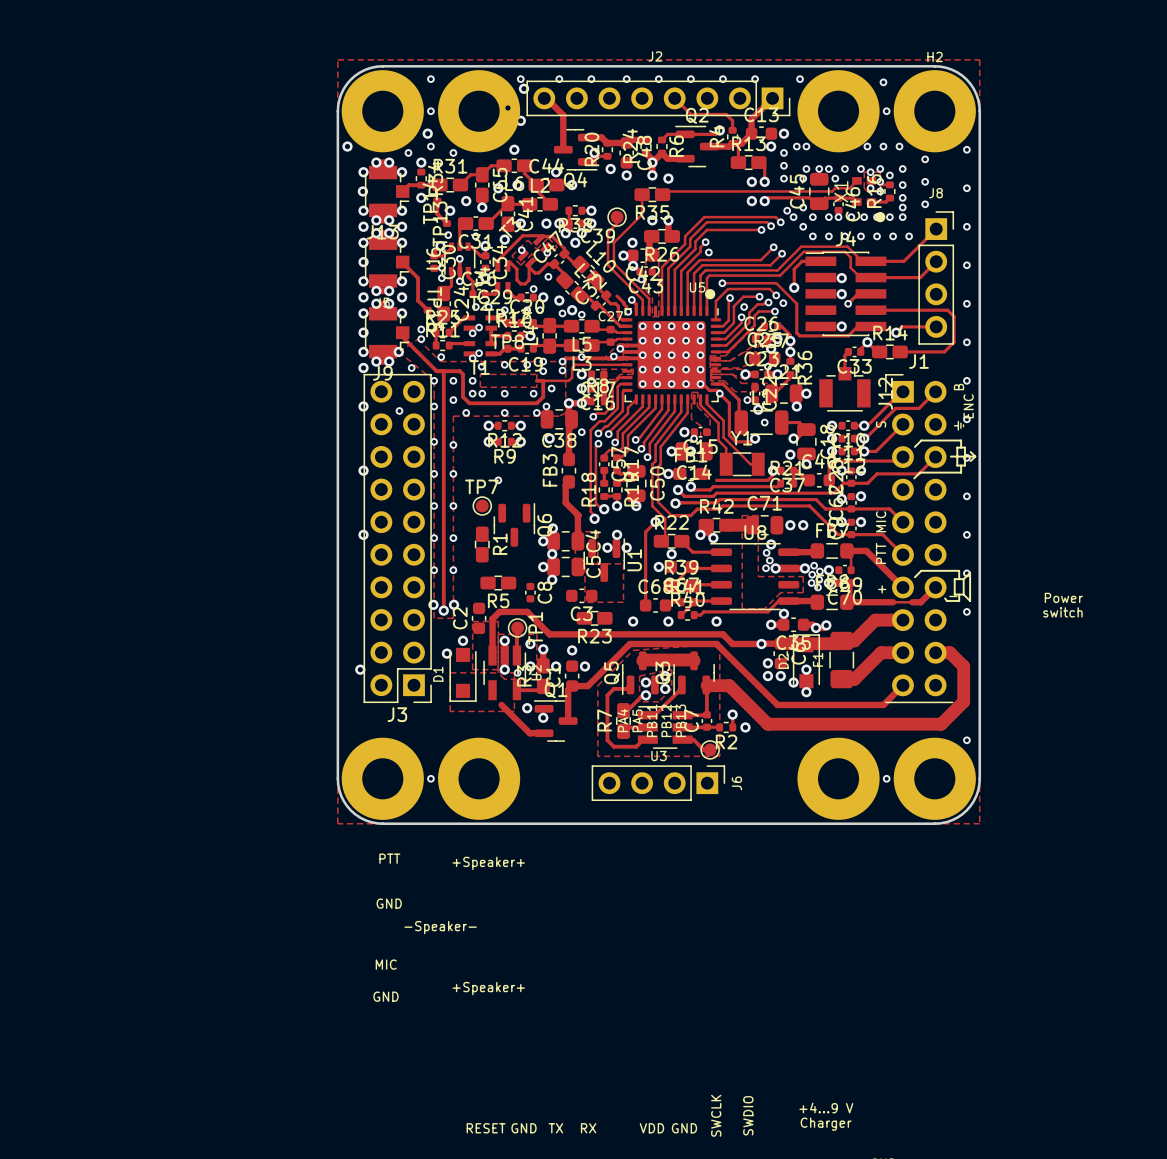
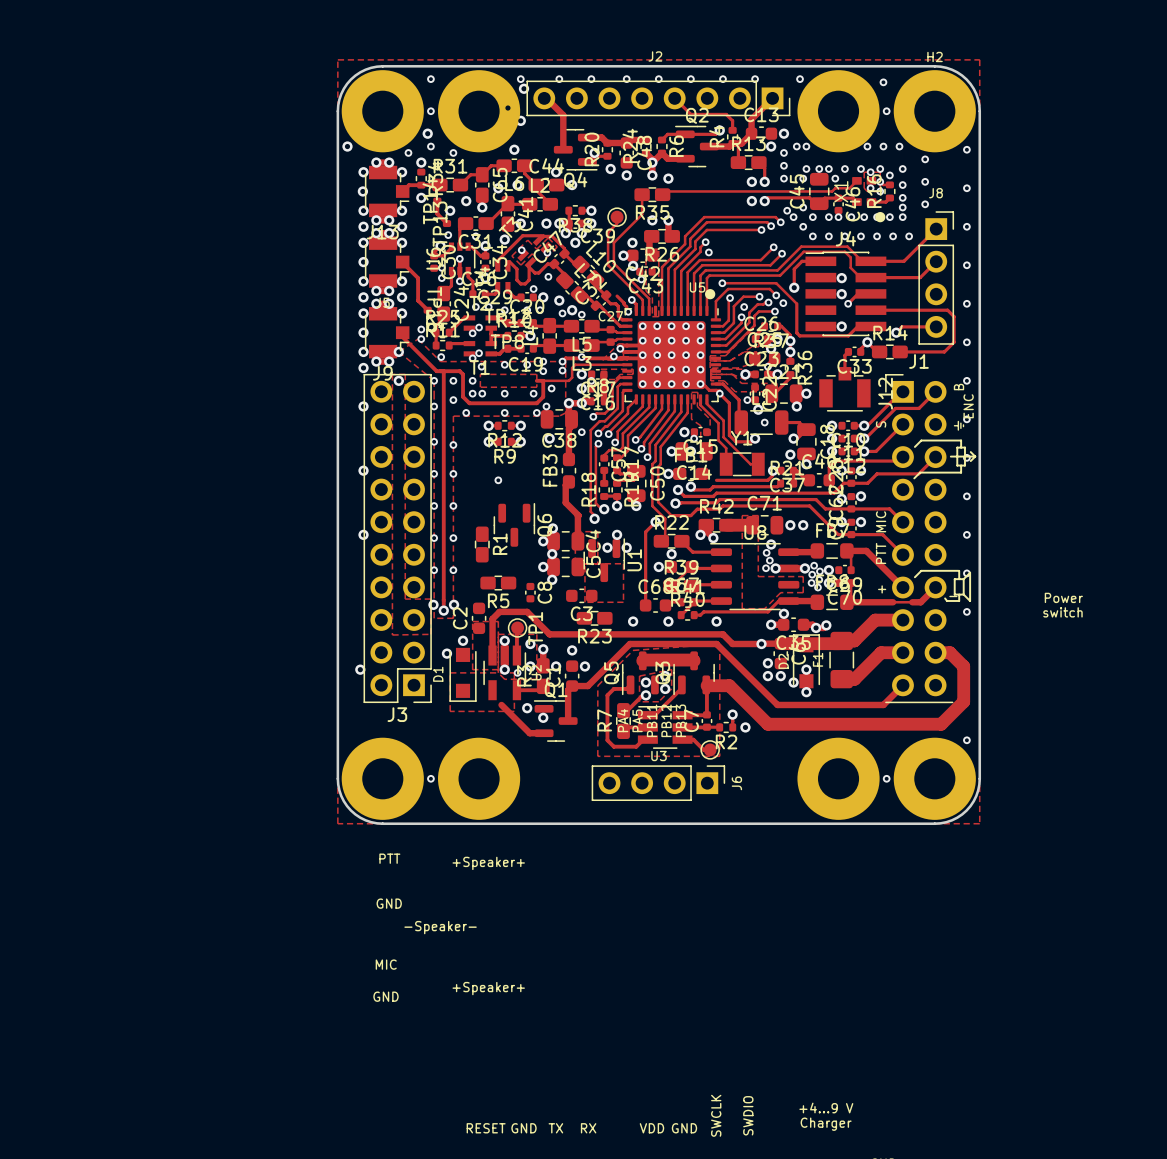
via: (411, 367) -> none
zone outline: none -> (392, 374) (405, 374) (405, 599) (430, 599) (430, 634) (392, 635) (392, 374)
via: none -> (398, 380)
via: (399, 410) -> none
TP7: (482, 505) -> none

